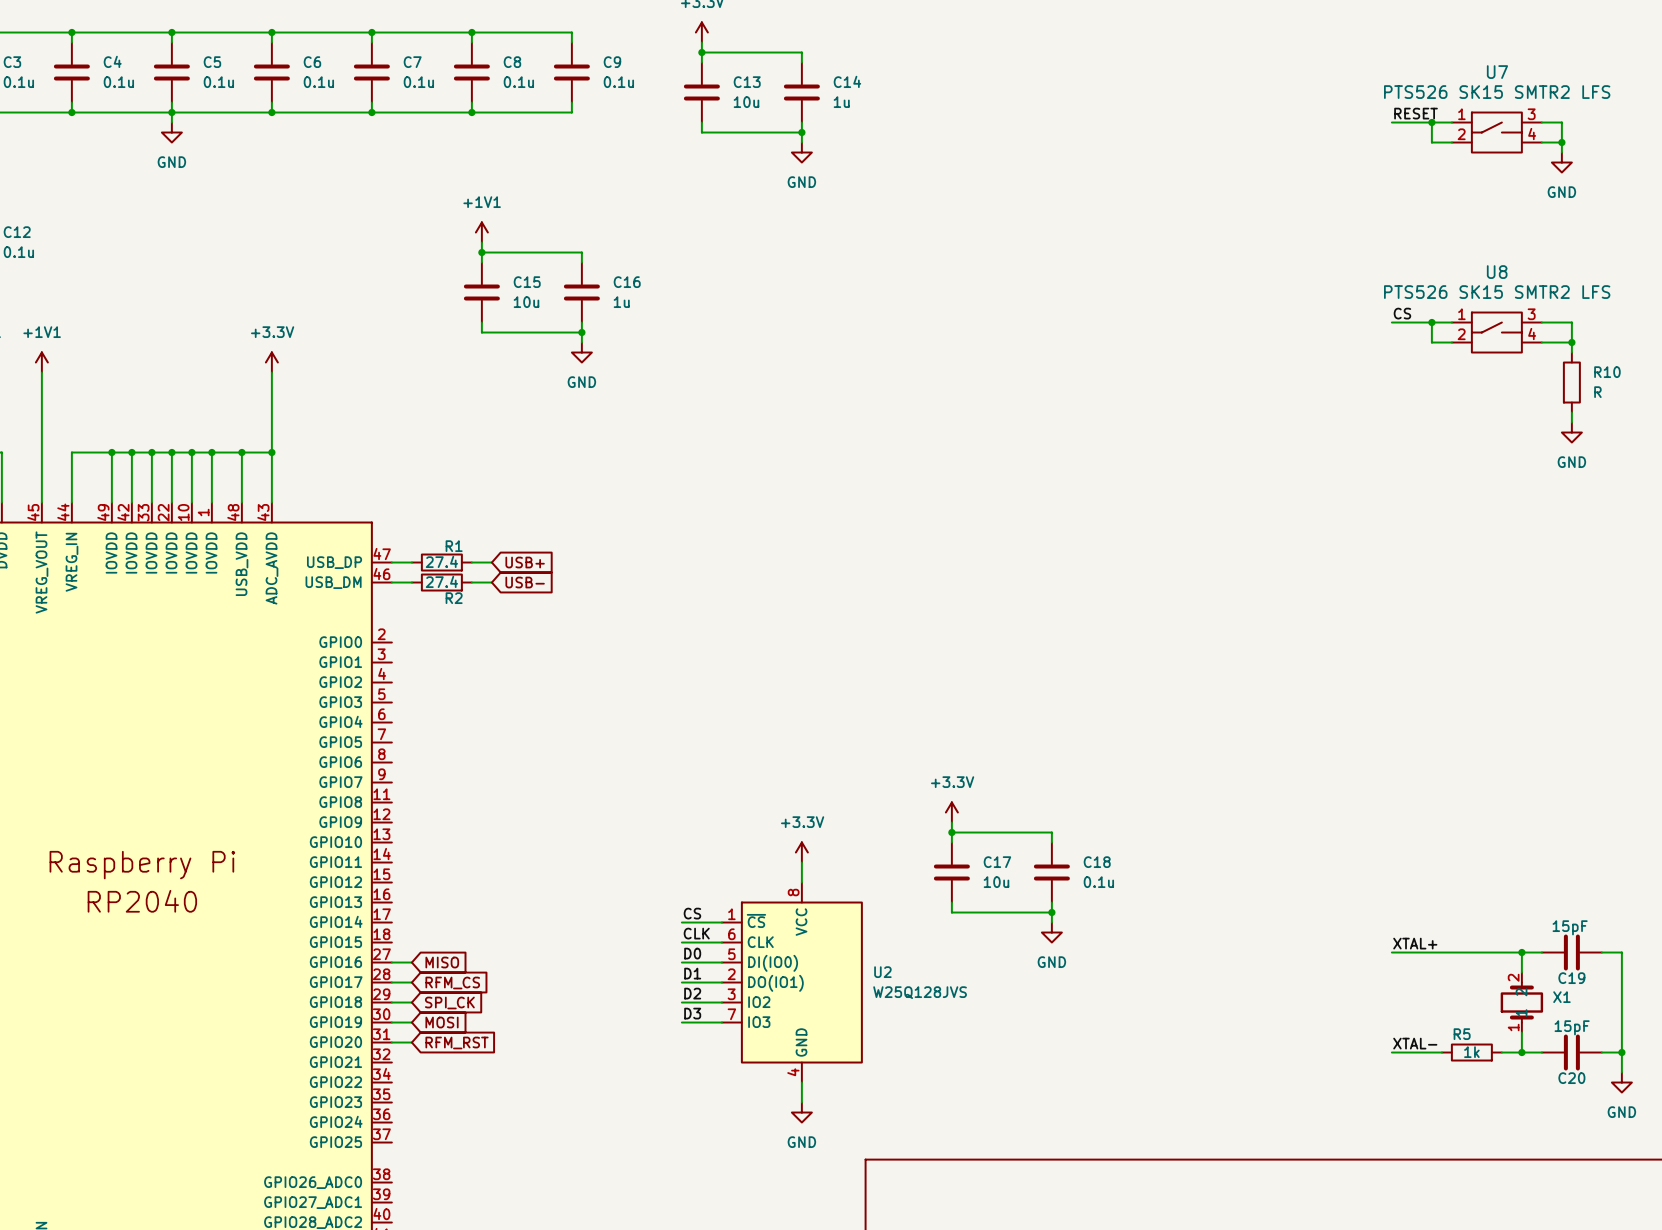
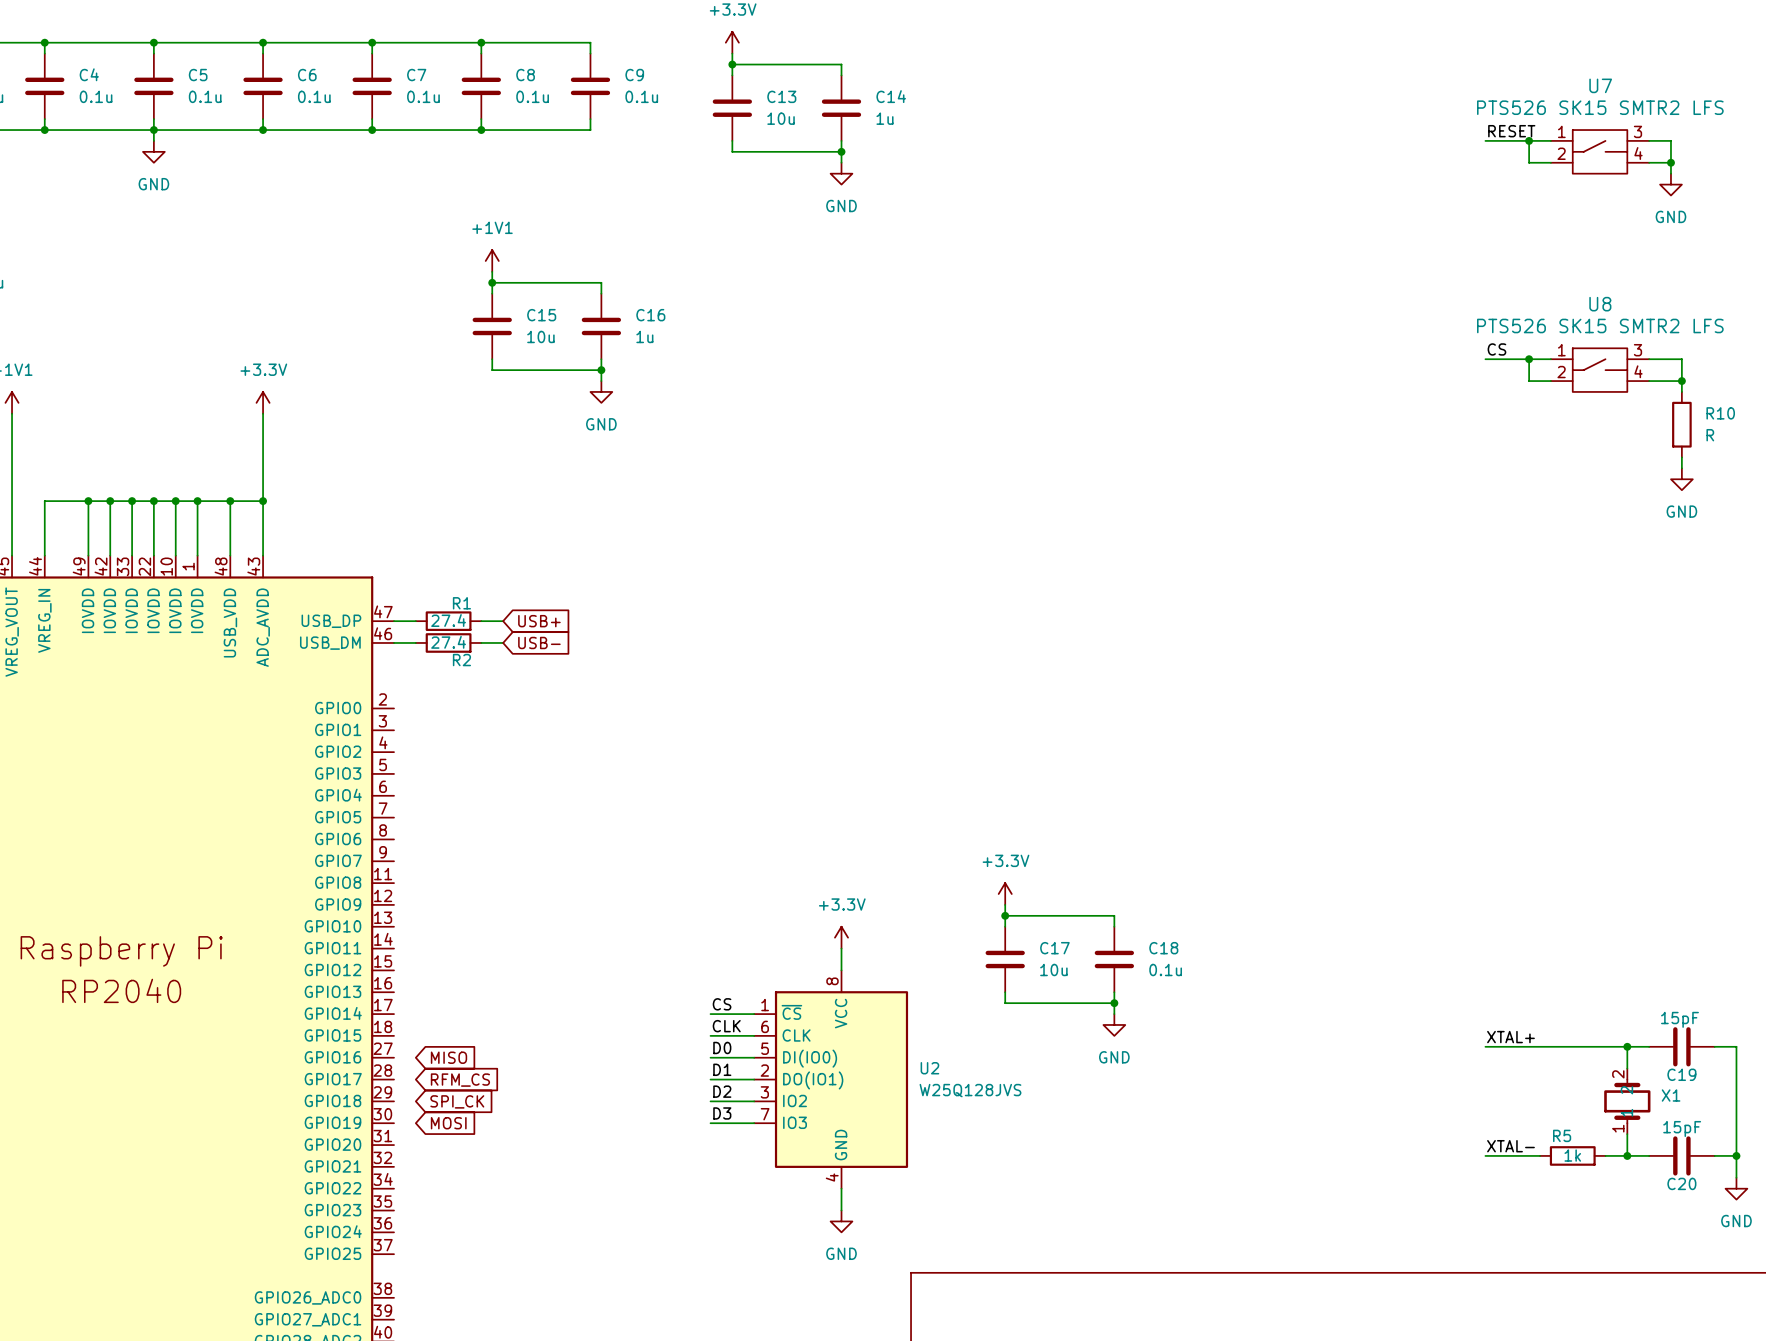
wire: (391, 962) (411, 962) -> none
wire: (391, 982) (411, 982) -> none
wire: (391, 1002) (411, 1002) -> none
wire: (391, 1022) (411, 1022) -> none
wire: (391, 1042) (411, 1042) -> none
global label: RFM_RST (457, 1042) -> none

